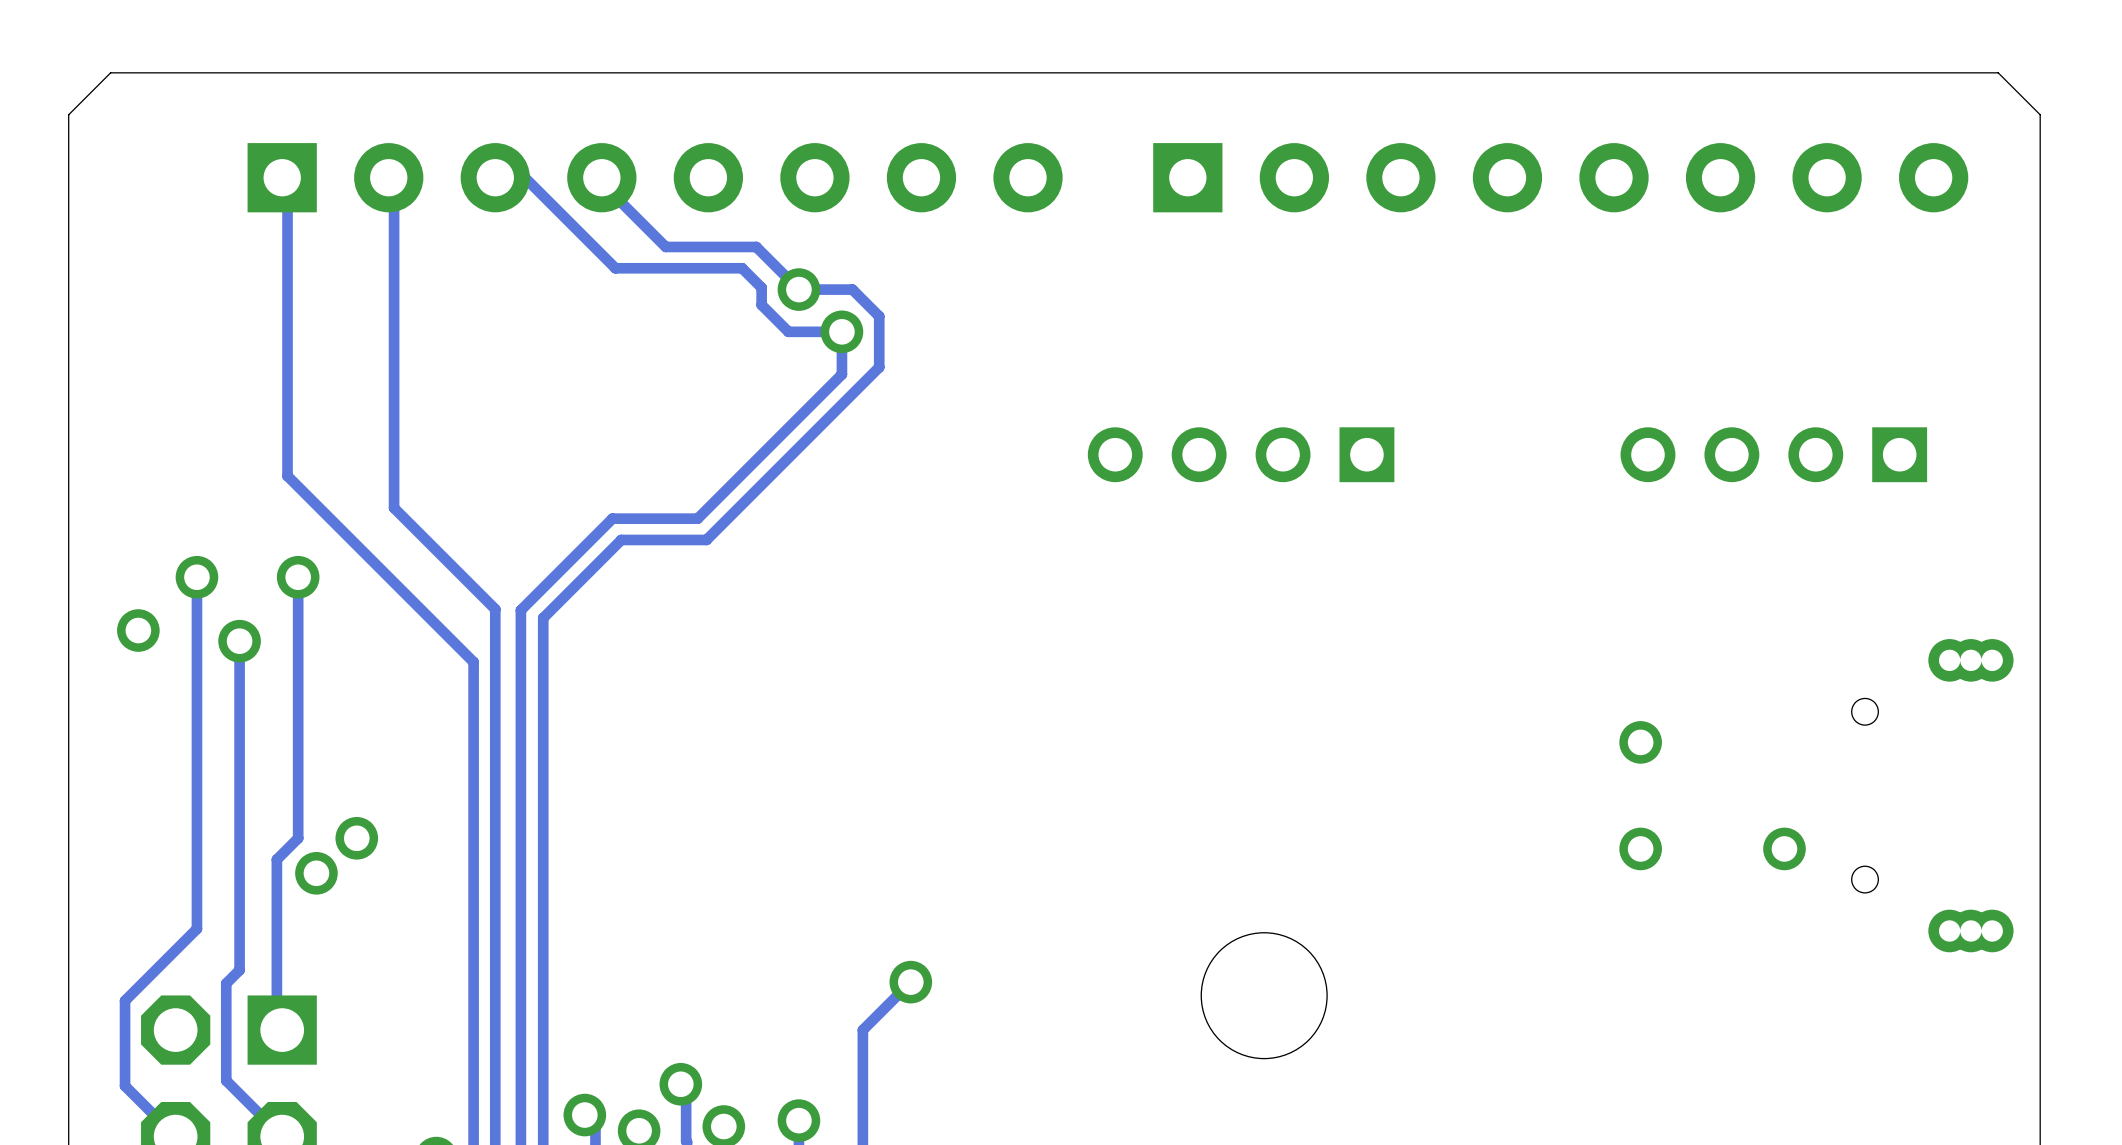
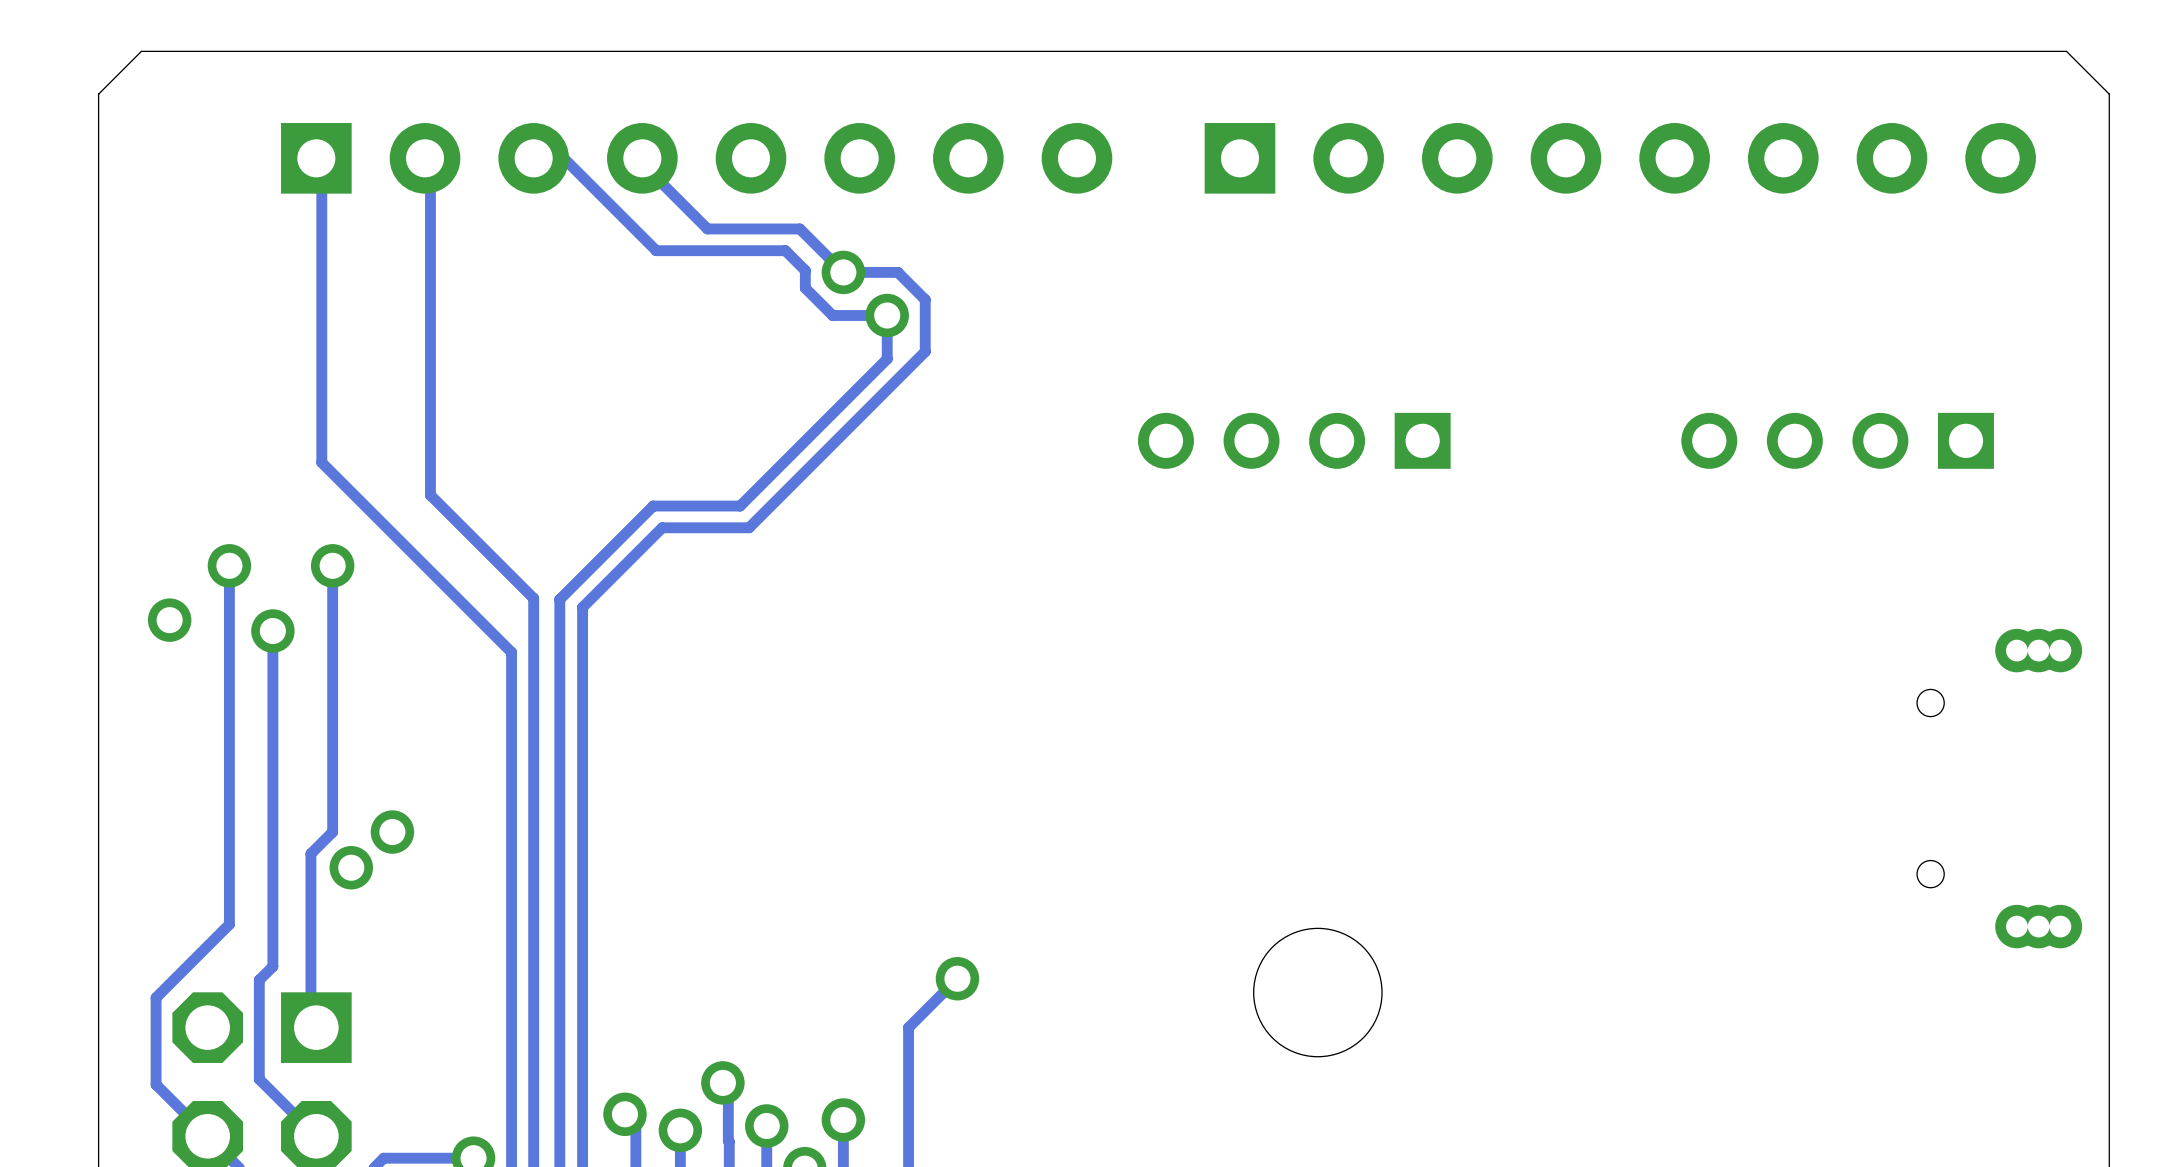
via: (1640, 742) -> none
via: (1640, 848) -> none
via: (1784, 848) -> none

